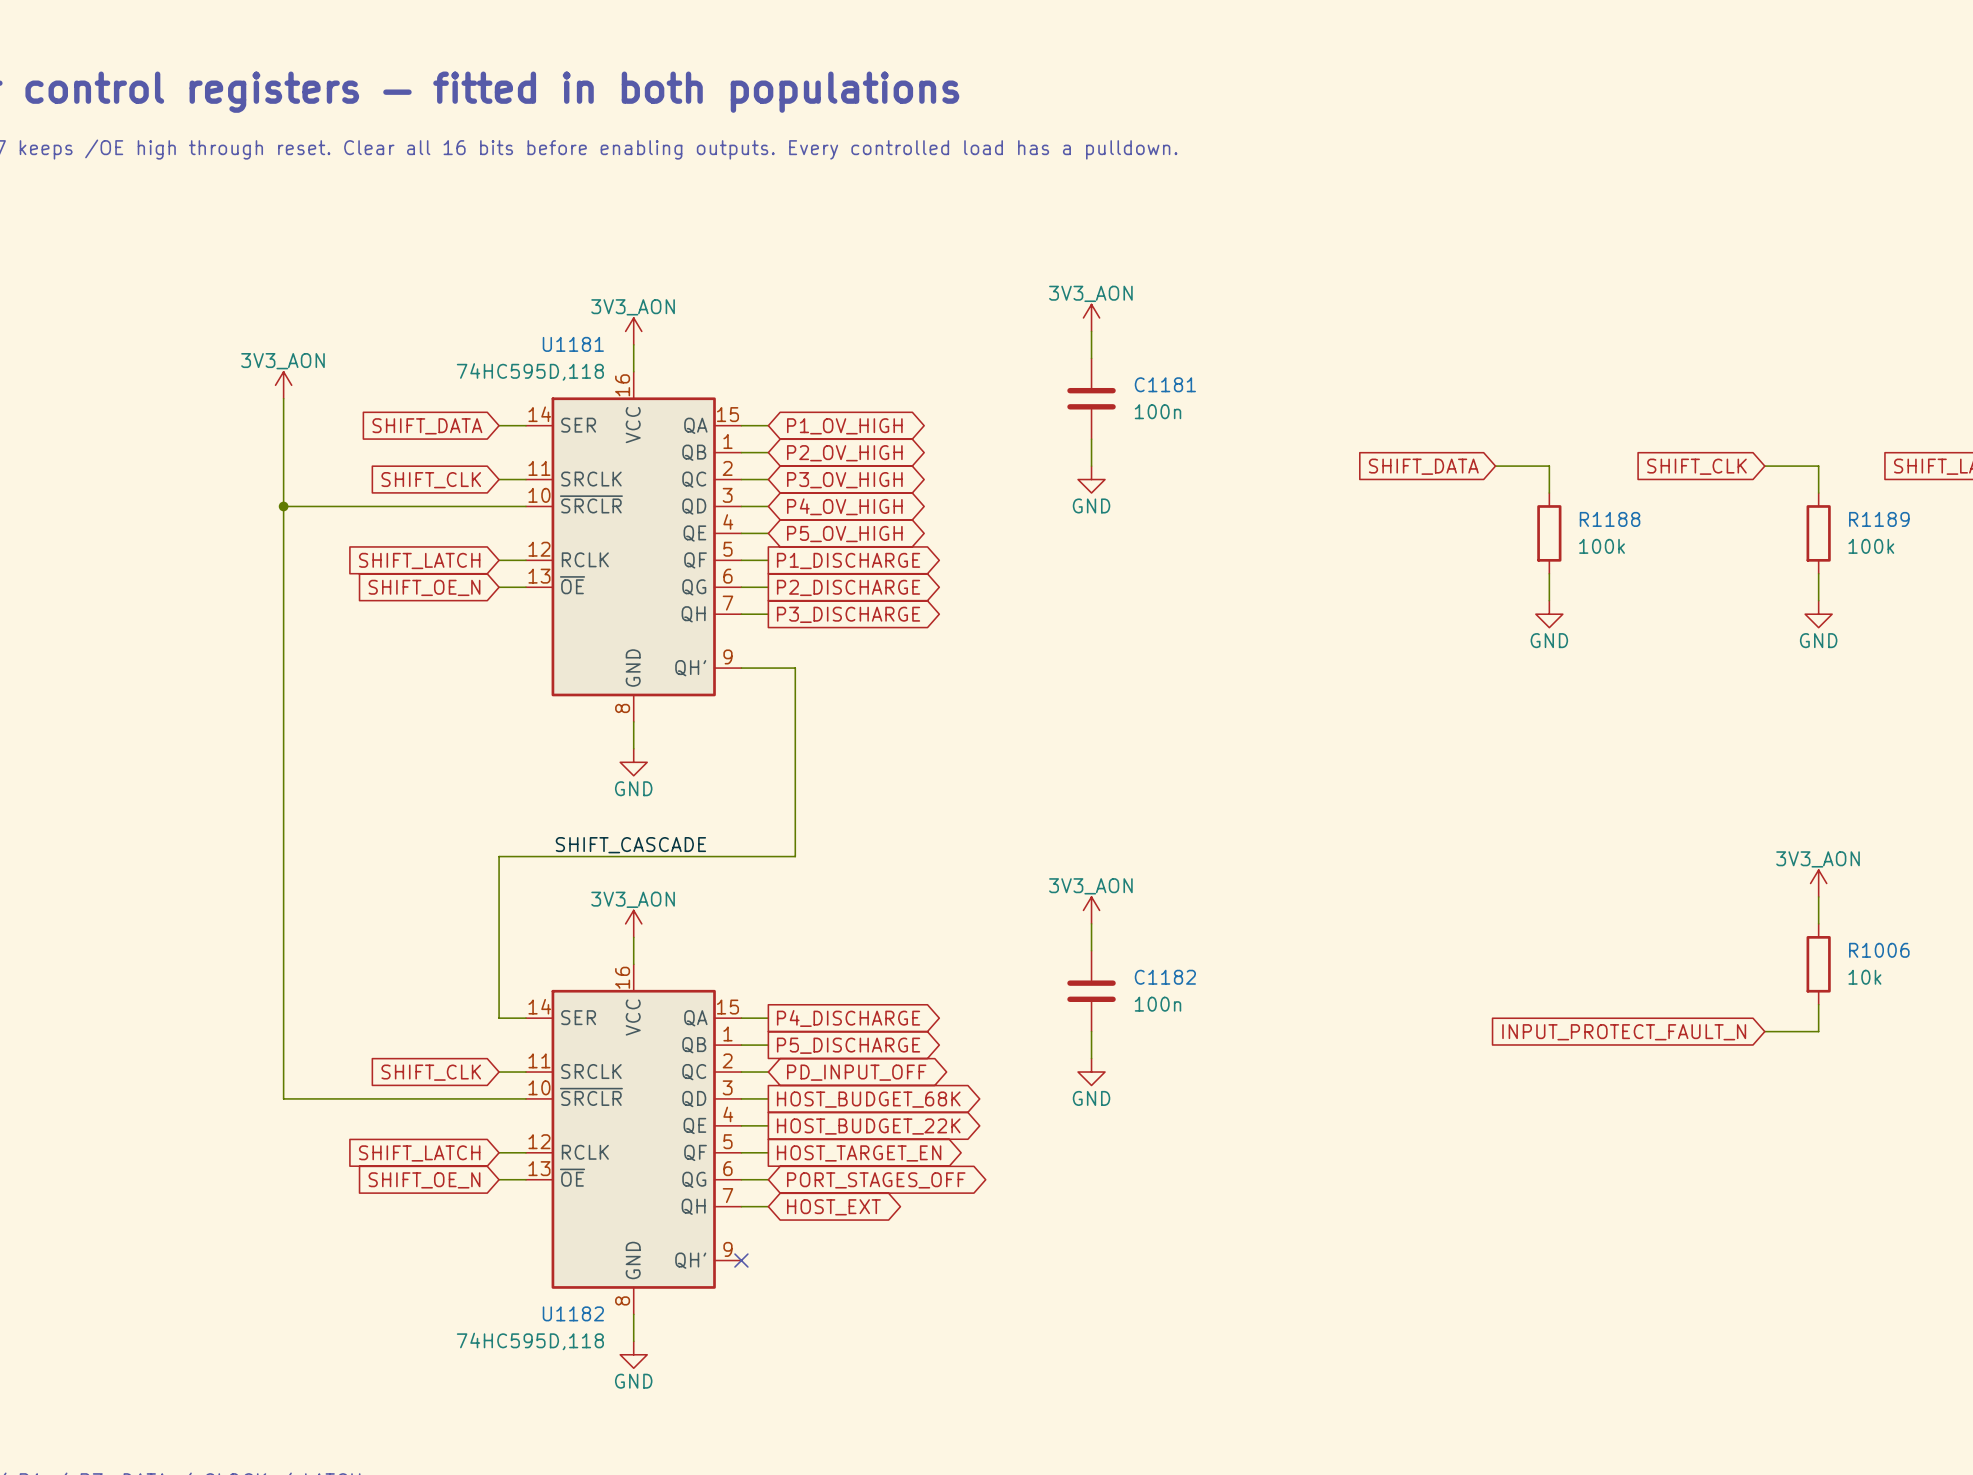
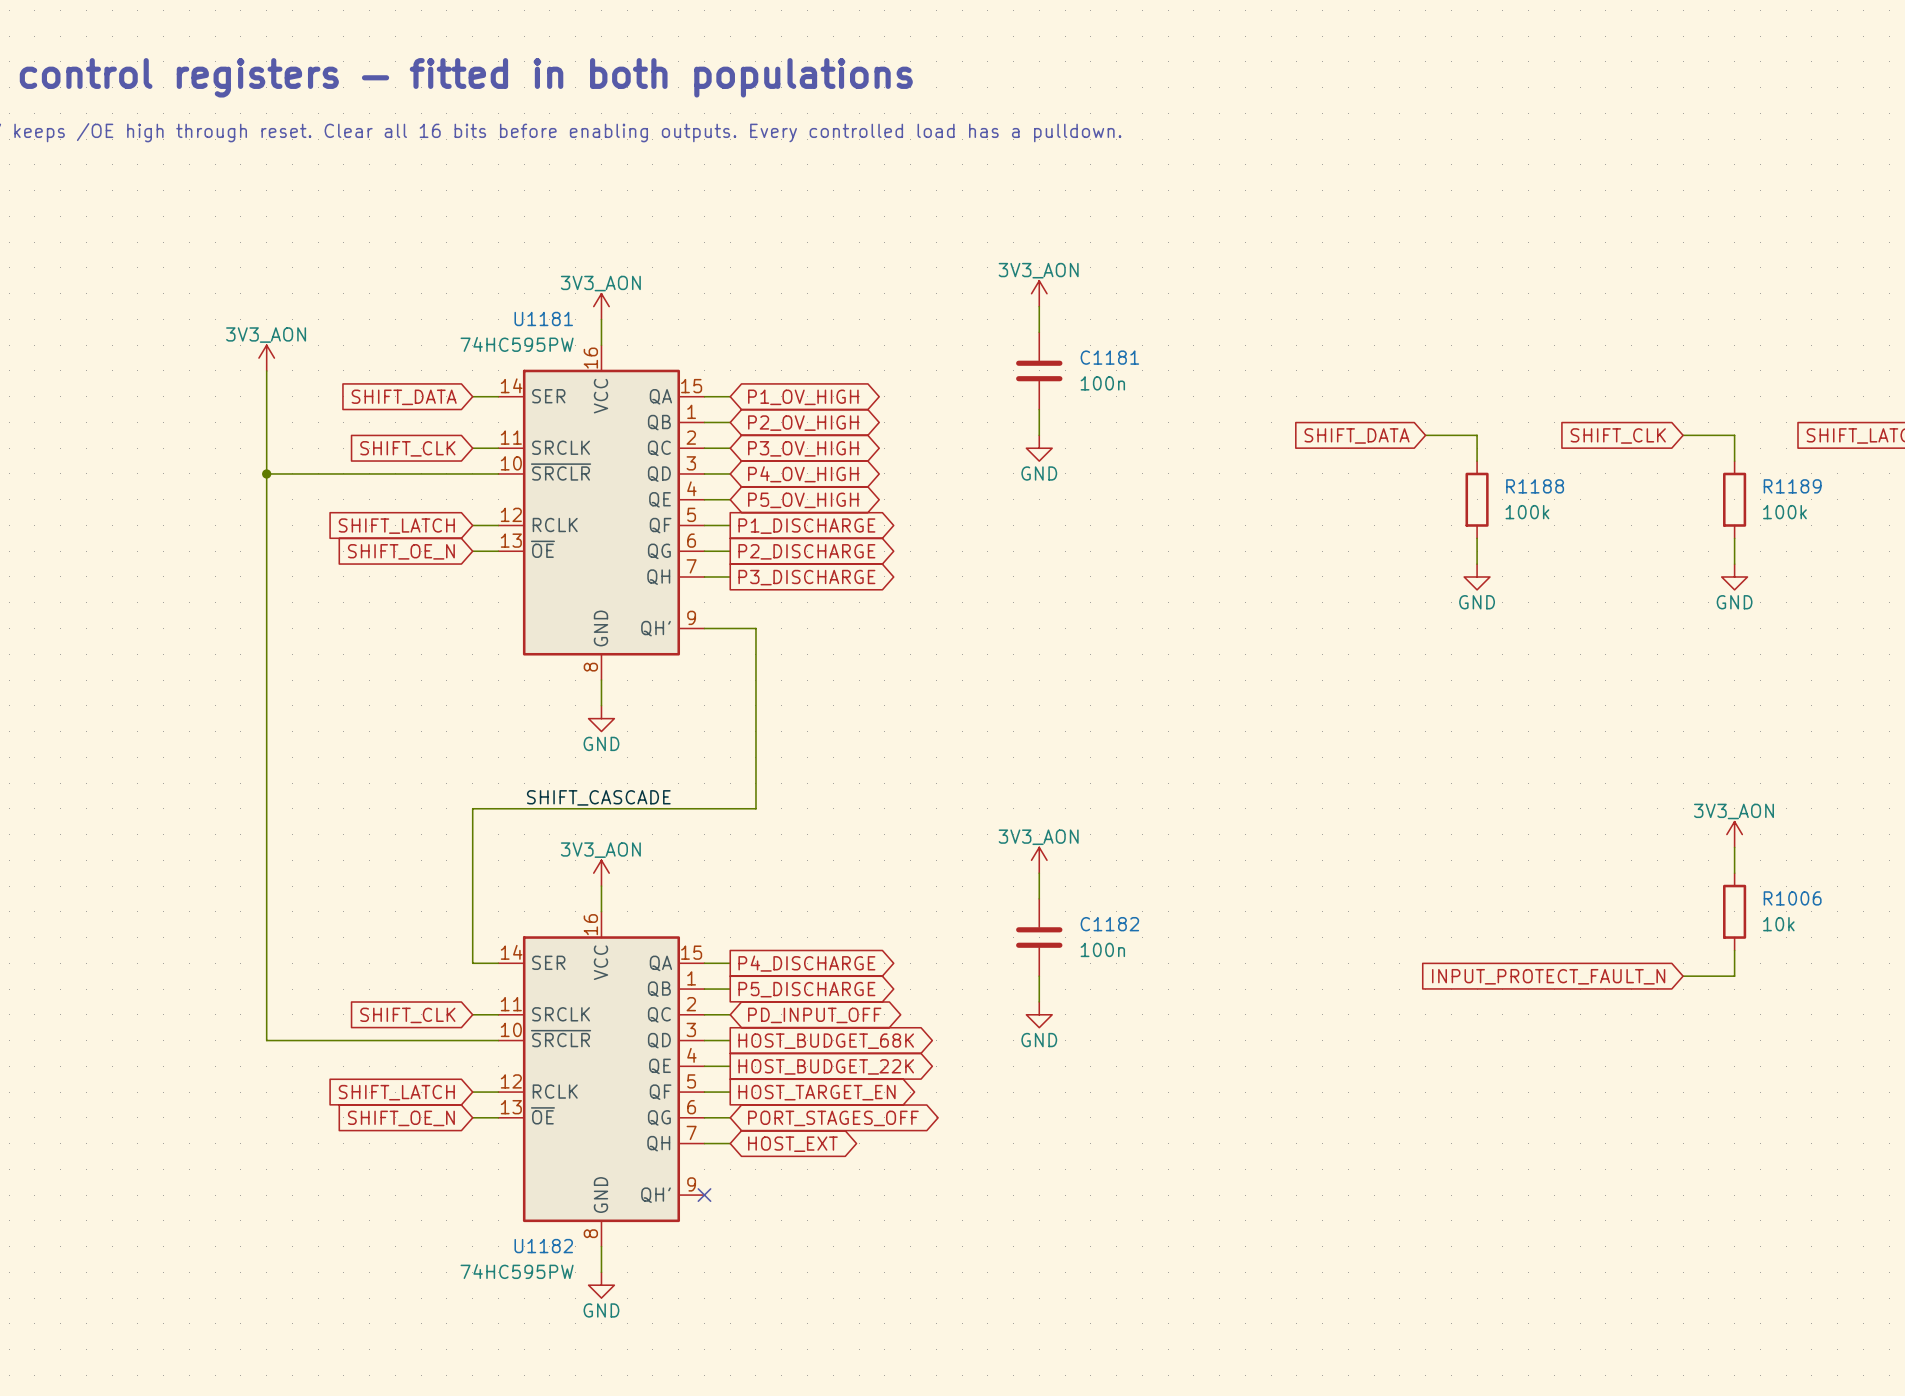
U1181 value: 74HC595D,118 (530, 371) -> 74HC595PW (517, 344)
U1182 value: 74HC595D,118 (530, 1341) -> 74HC595PW (517, 1271)

